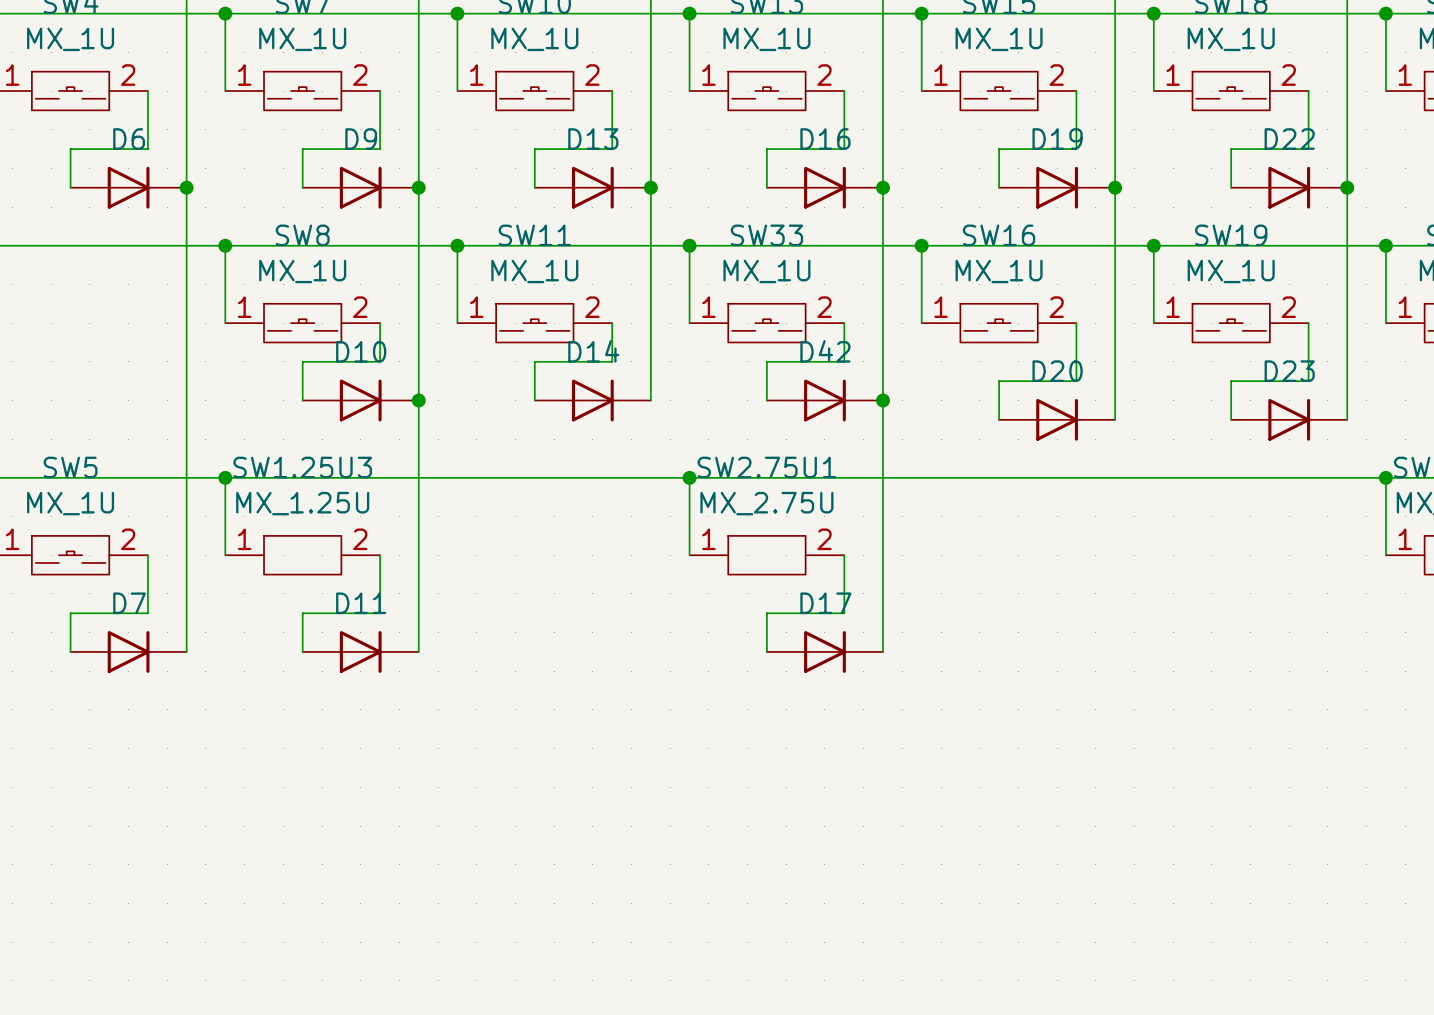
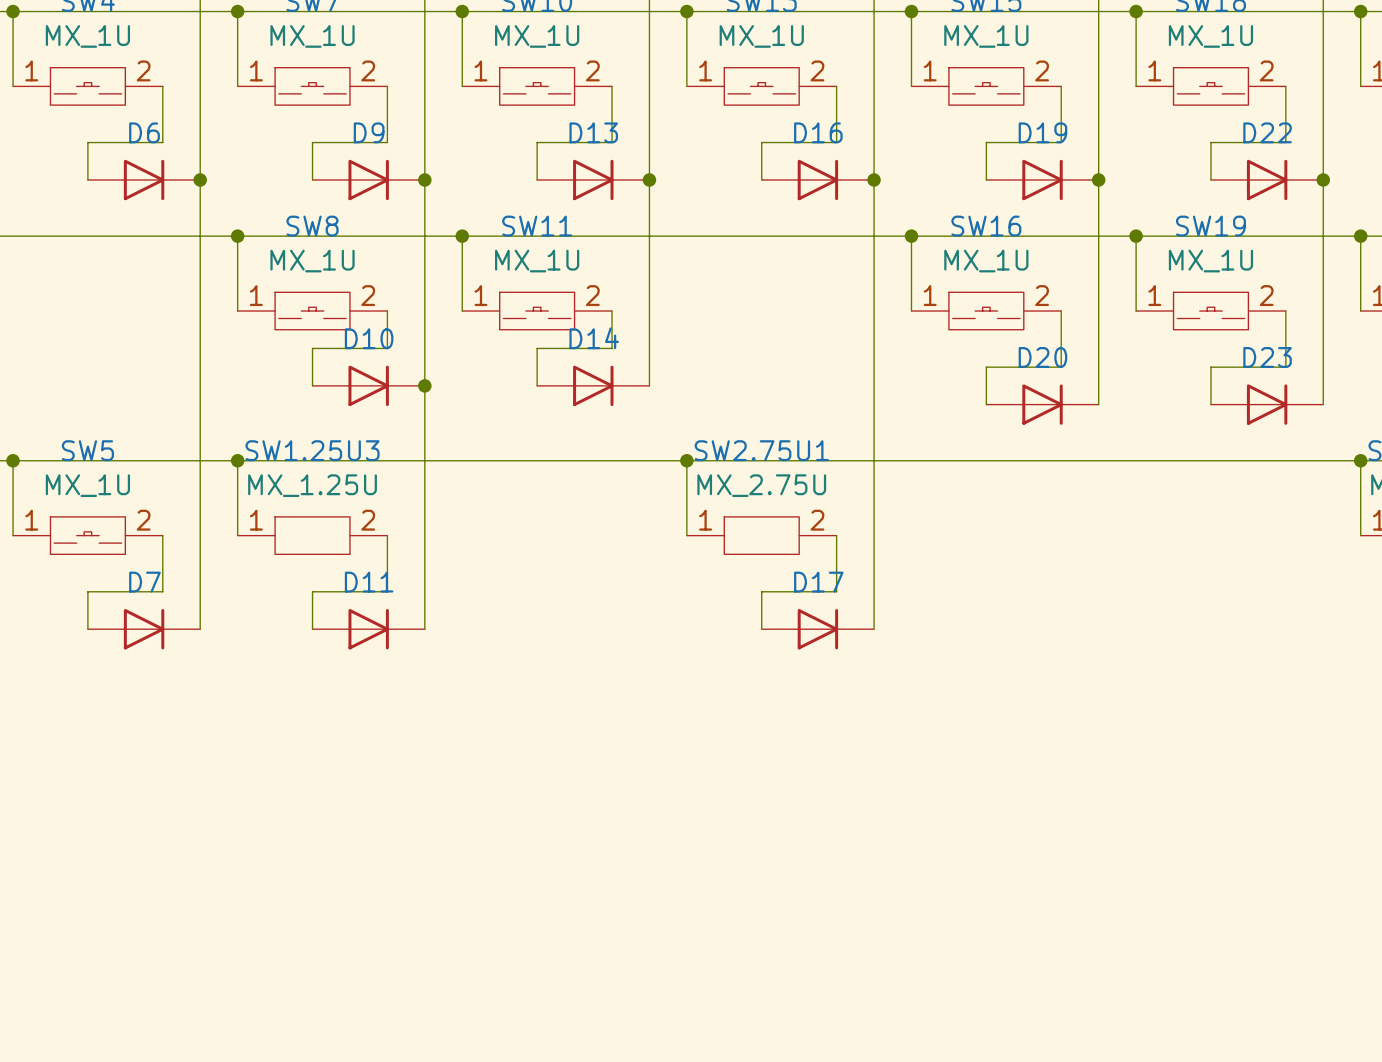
wire: (689, 245) (689, 323) -> none
junction: (689, 245) -> none
SW33: MX_1U (766, 323) -> none
wire: (844, 323) (844, 361) (766, 361) (766, 400) -> none
D42: (824, 400) -> none
junction: (883, 400) -> none

